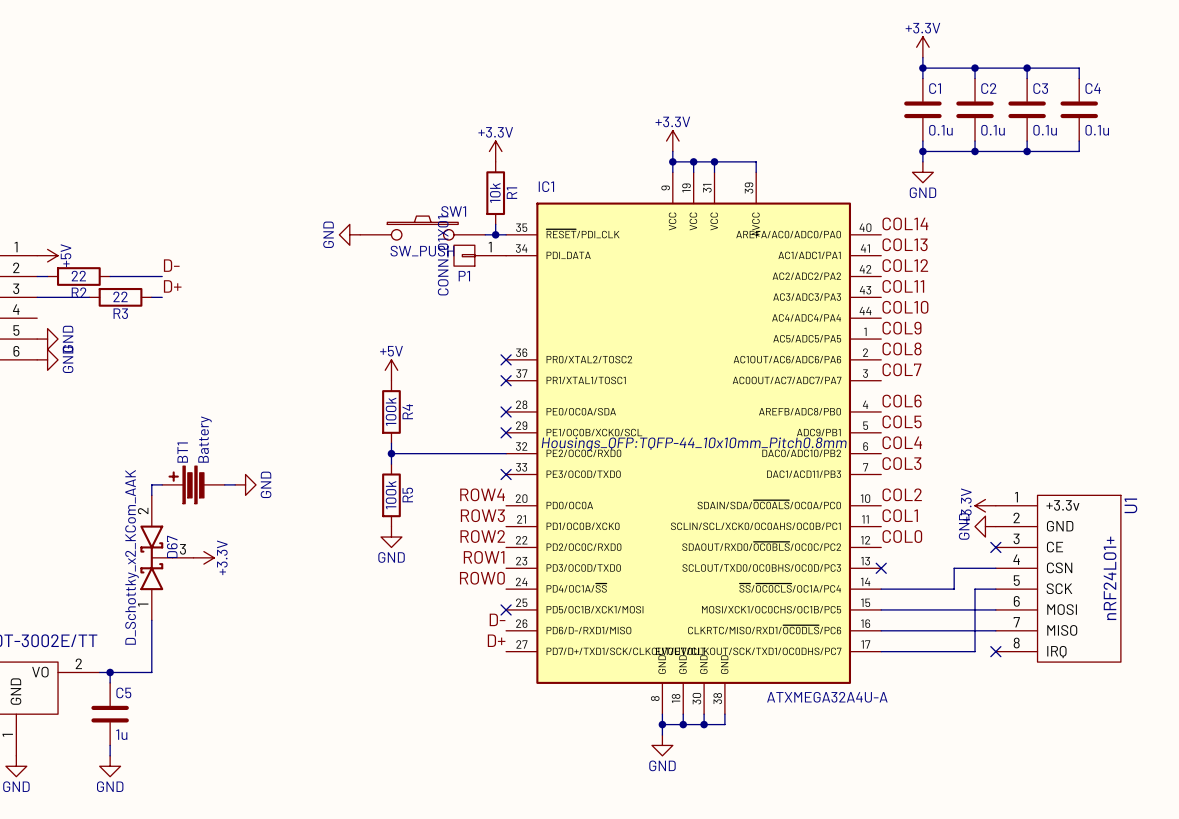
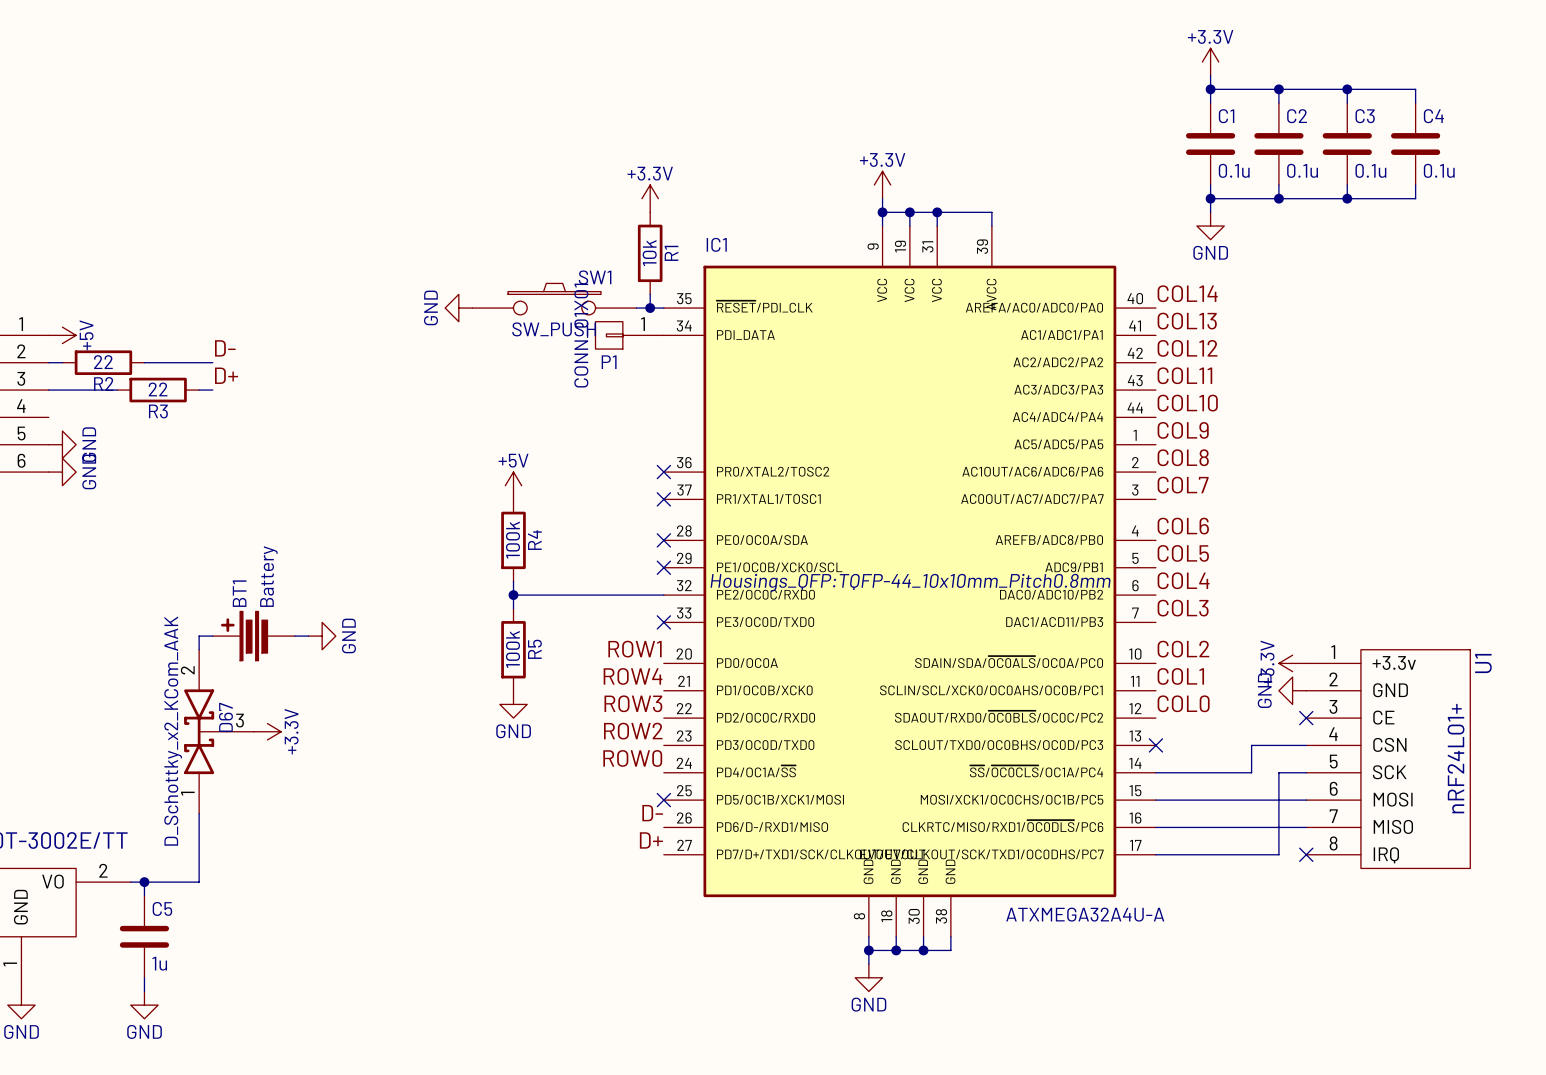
label: ROW4 (482, 494) -> ROW1 (635, 649)
label: ROW3 (482, 515) -> ROW4 (633, 676)
label: ROW2 (482, 536) -> ROW3 (633, 703)
label: ROW1 (484, 557) -> ROW2 (633, 731)

